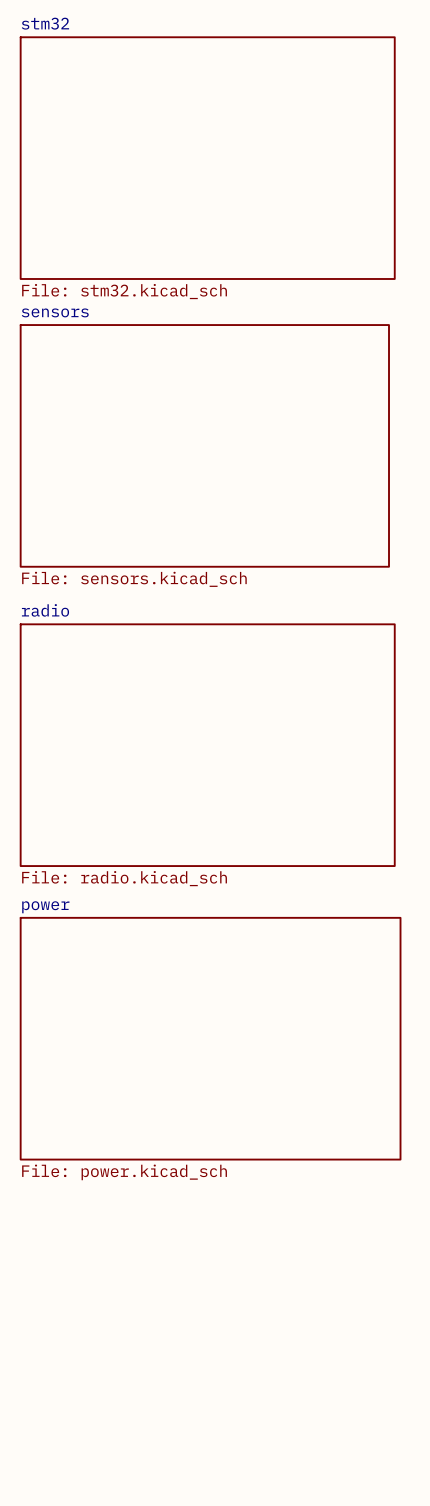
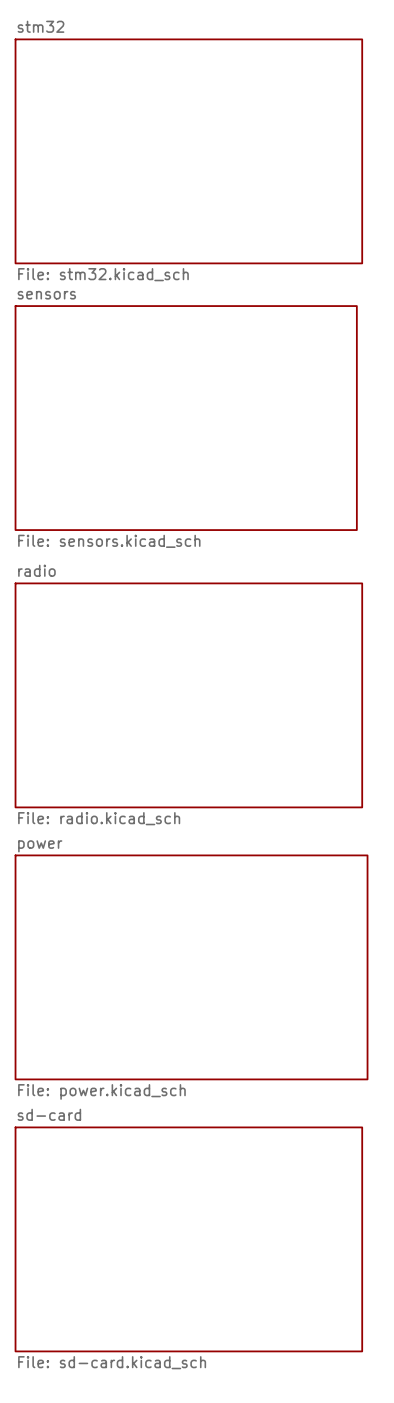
sheet sd-card: none -> File: sd-card.kicad_sch (188, 1239)

